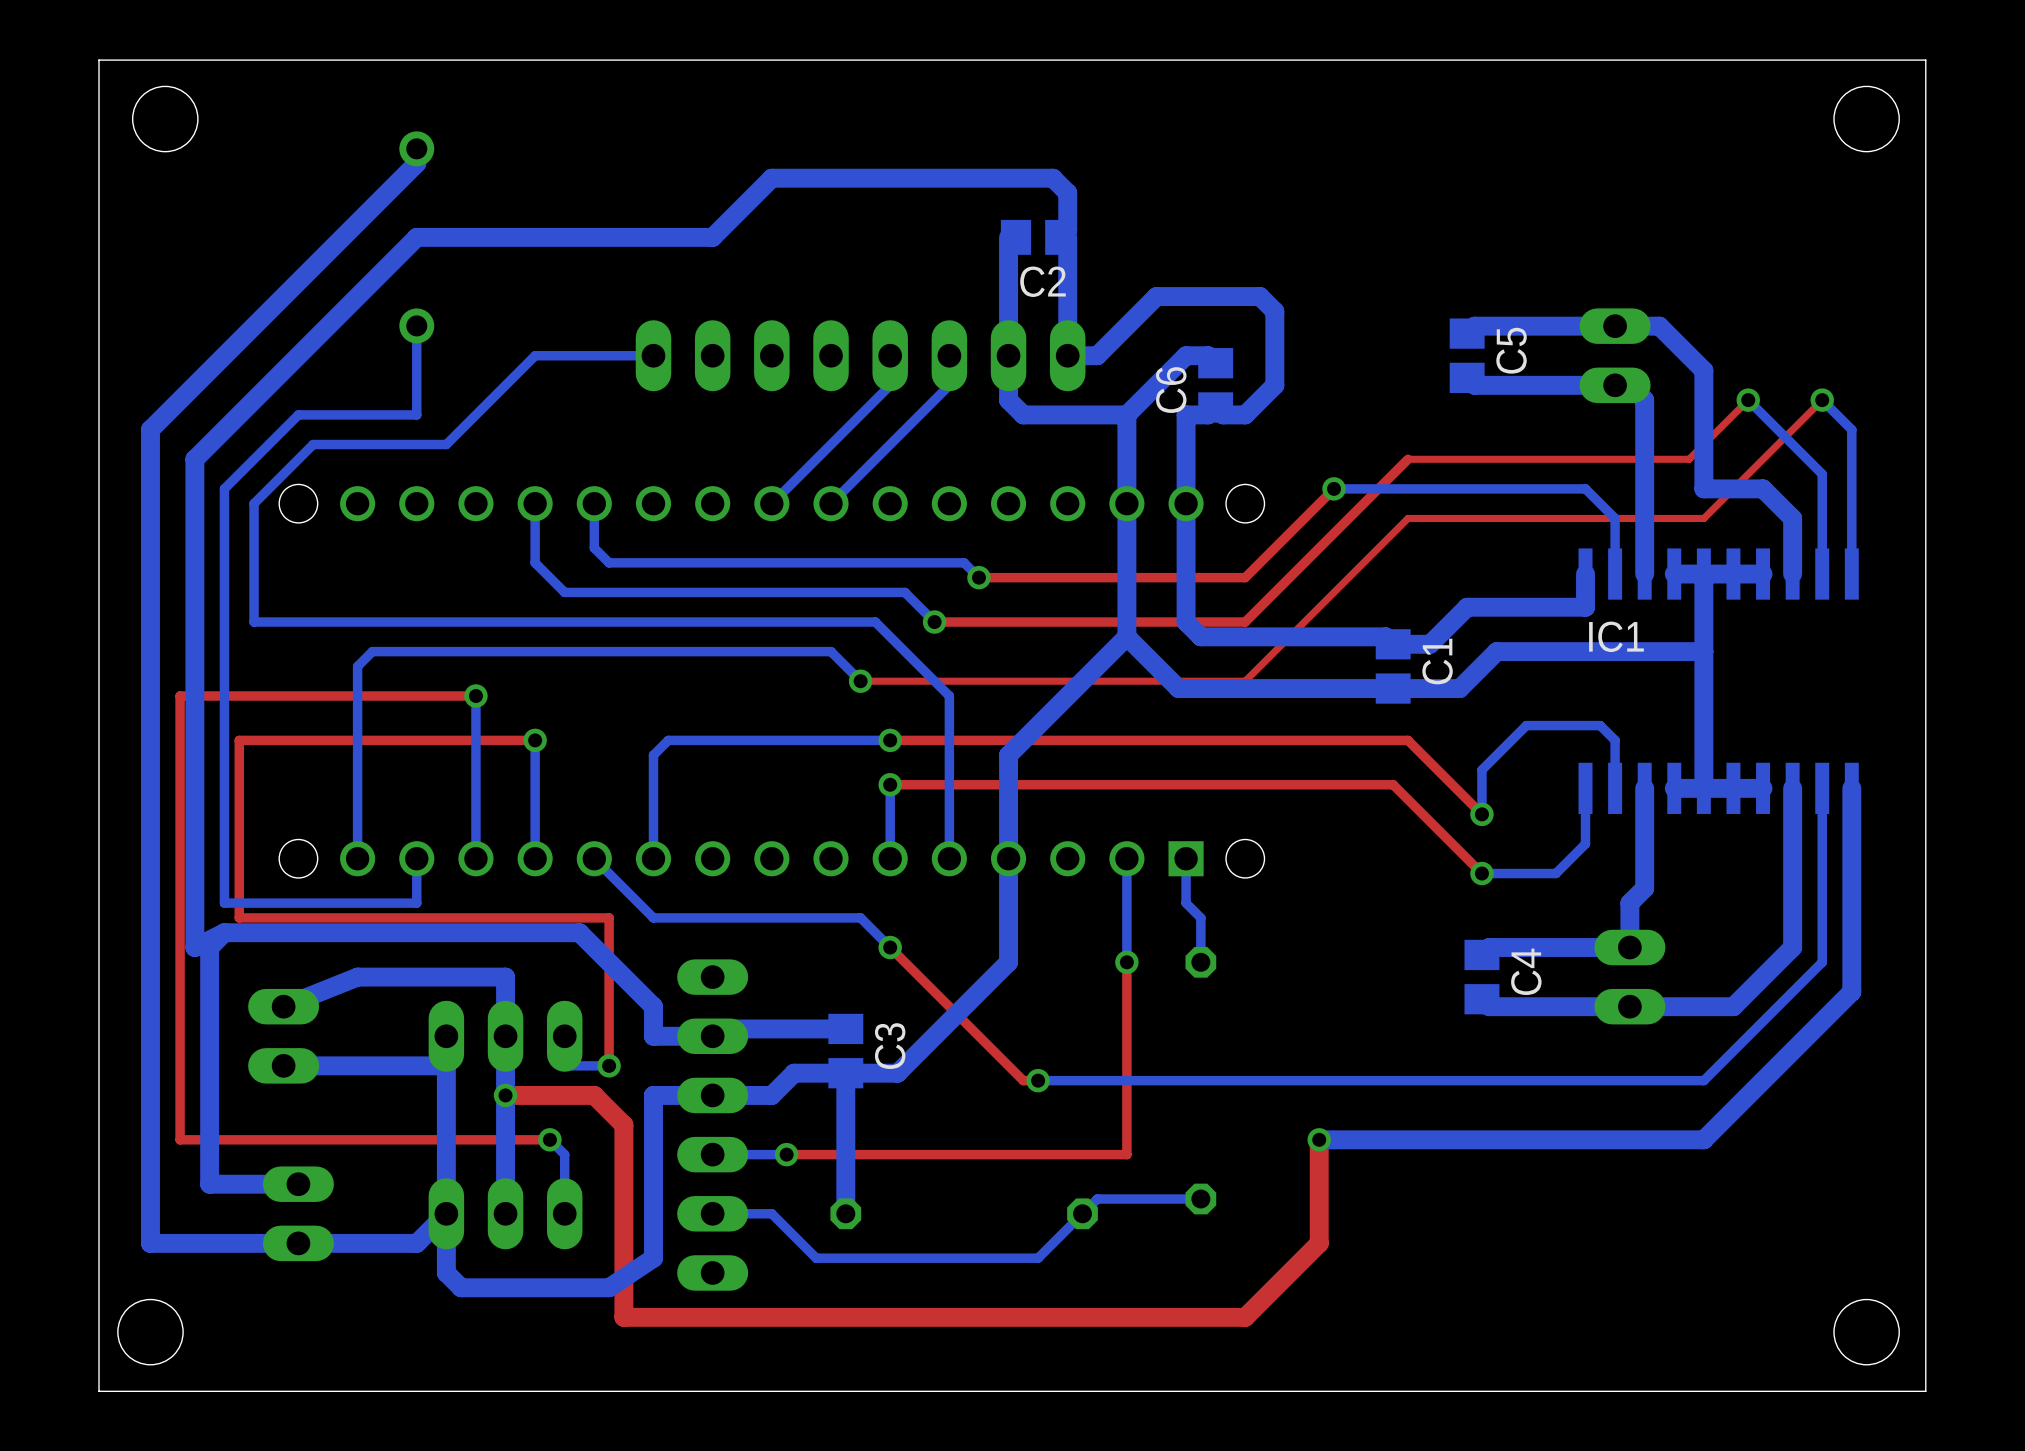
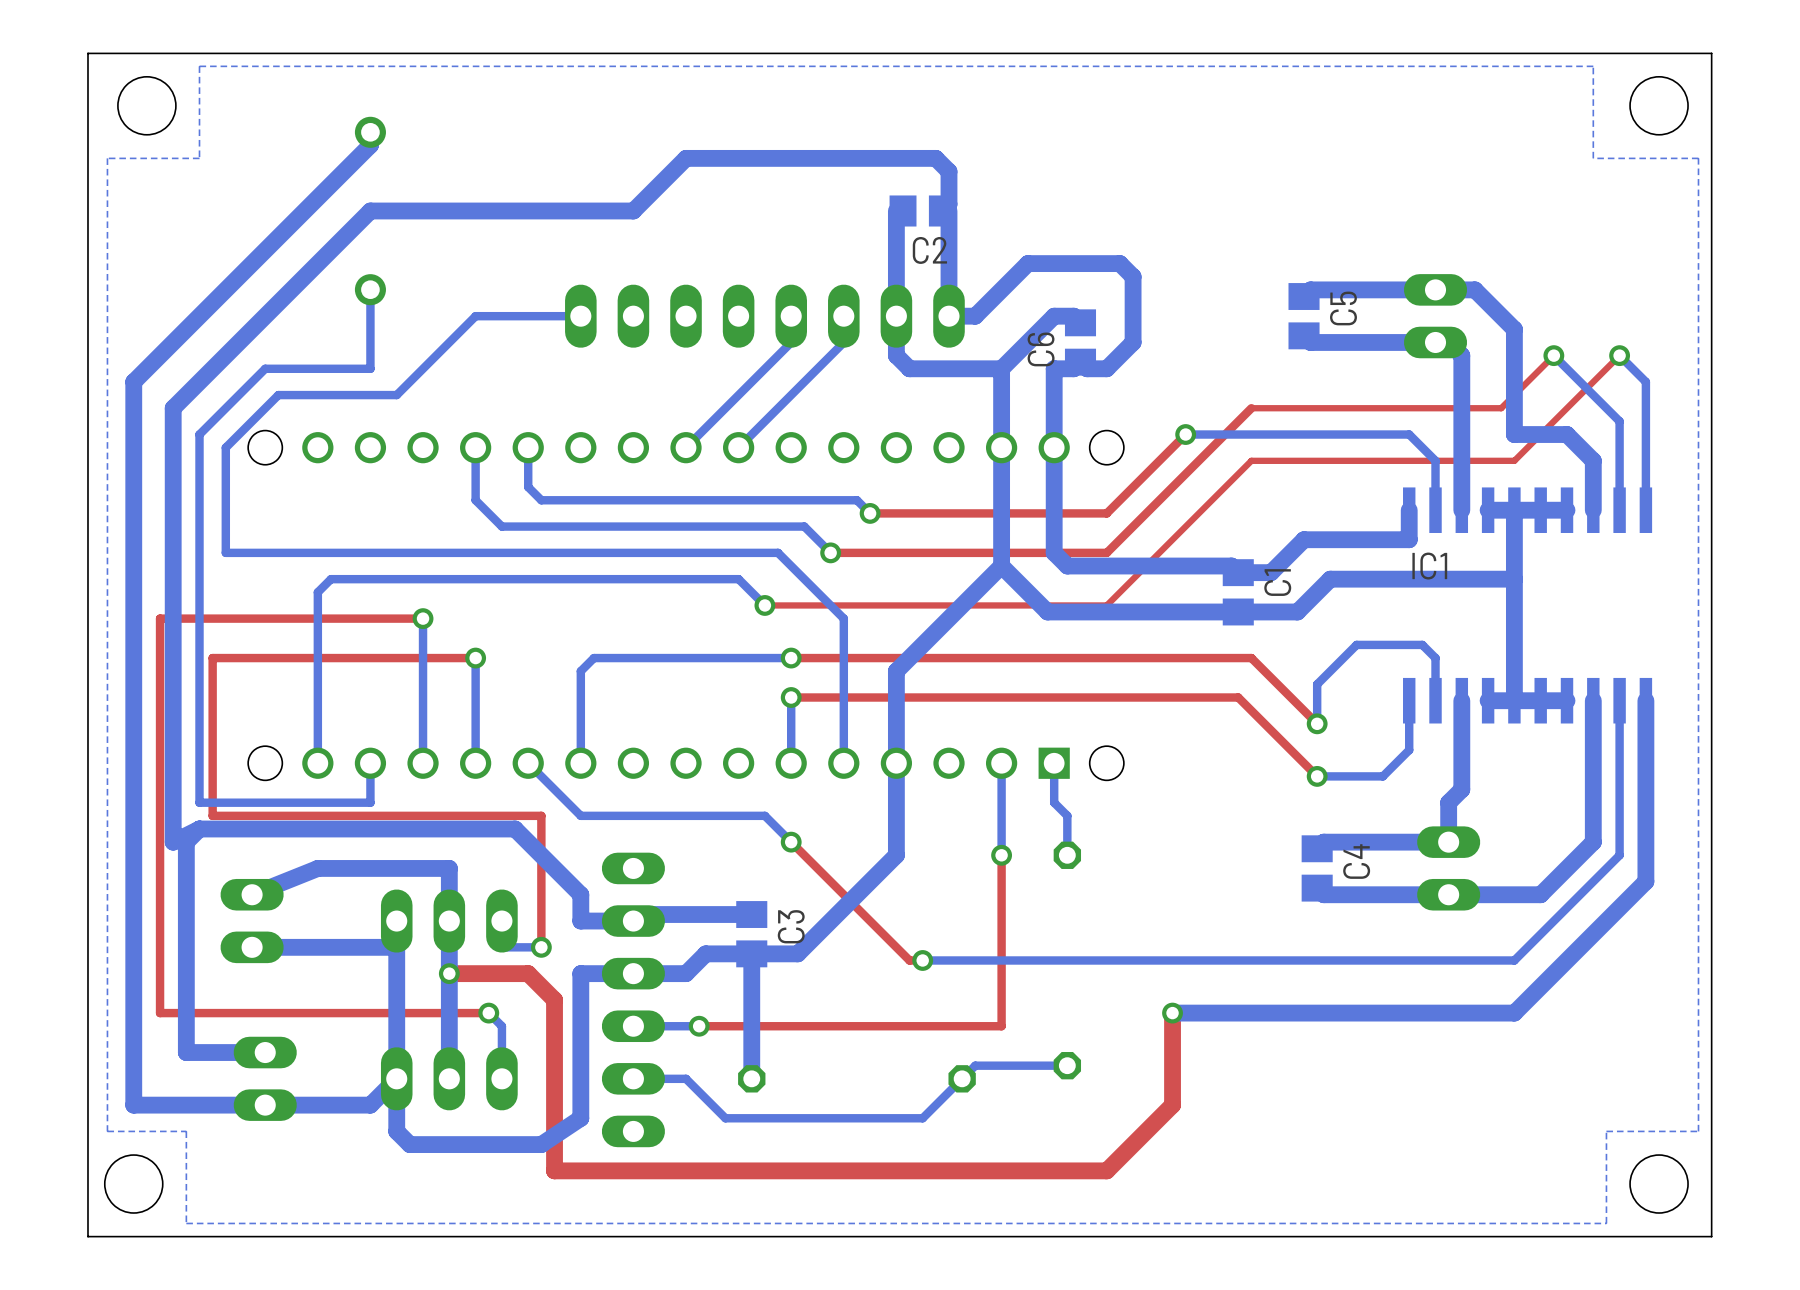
bottom zone outline: none -> (1593, 66) (1593, 158) (1698, 158) (1698, 1131) (1606, 1131) (1606, 1223) (186, 1223) (186, 1131) (107, 1131) (107, 158) (199, 158) (199, 66) (1593, 66)

